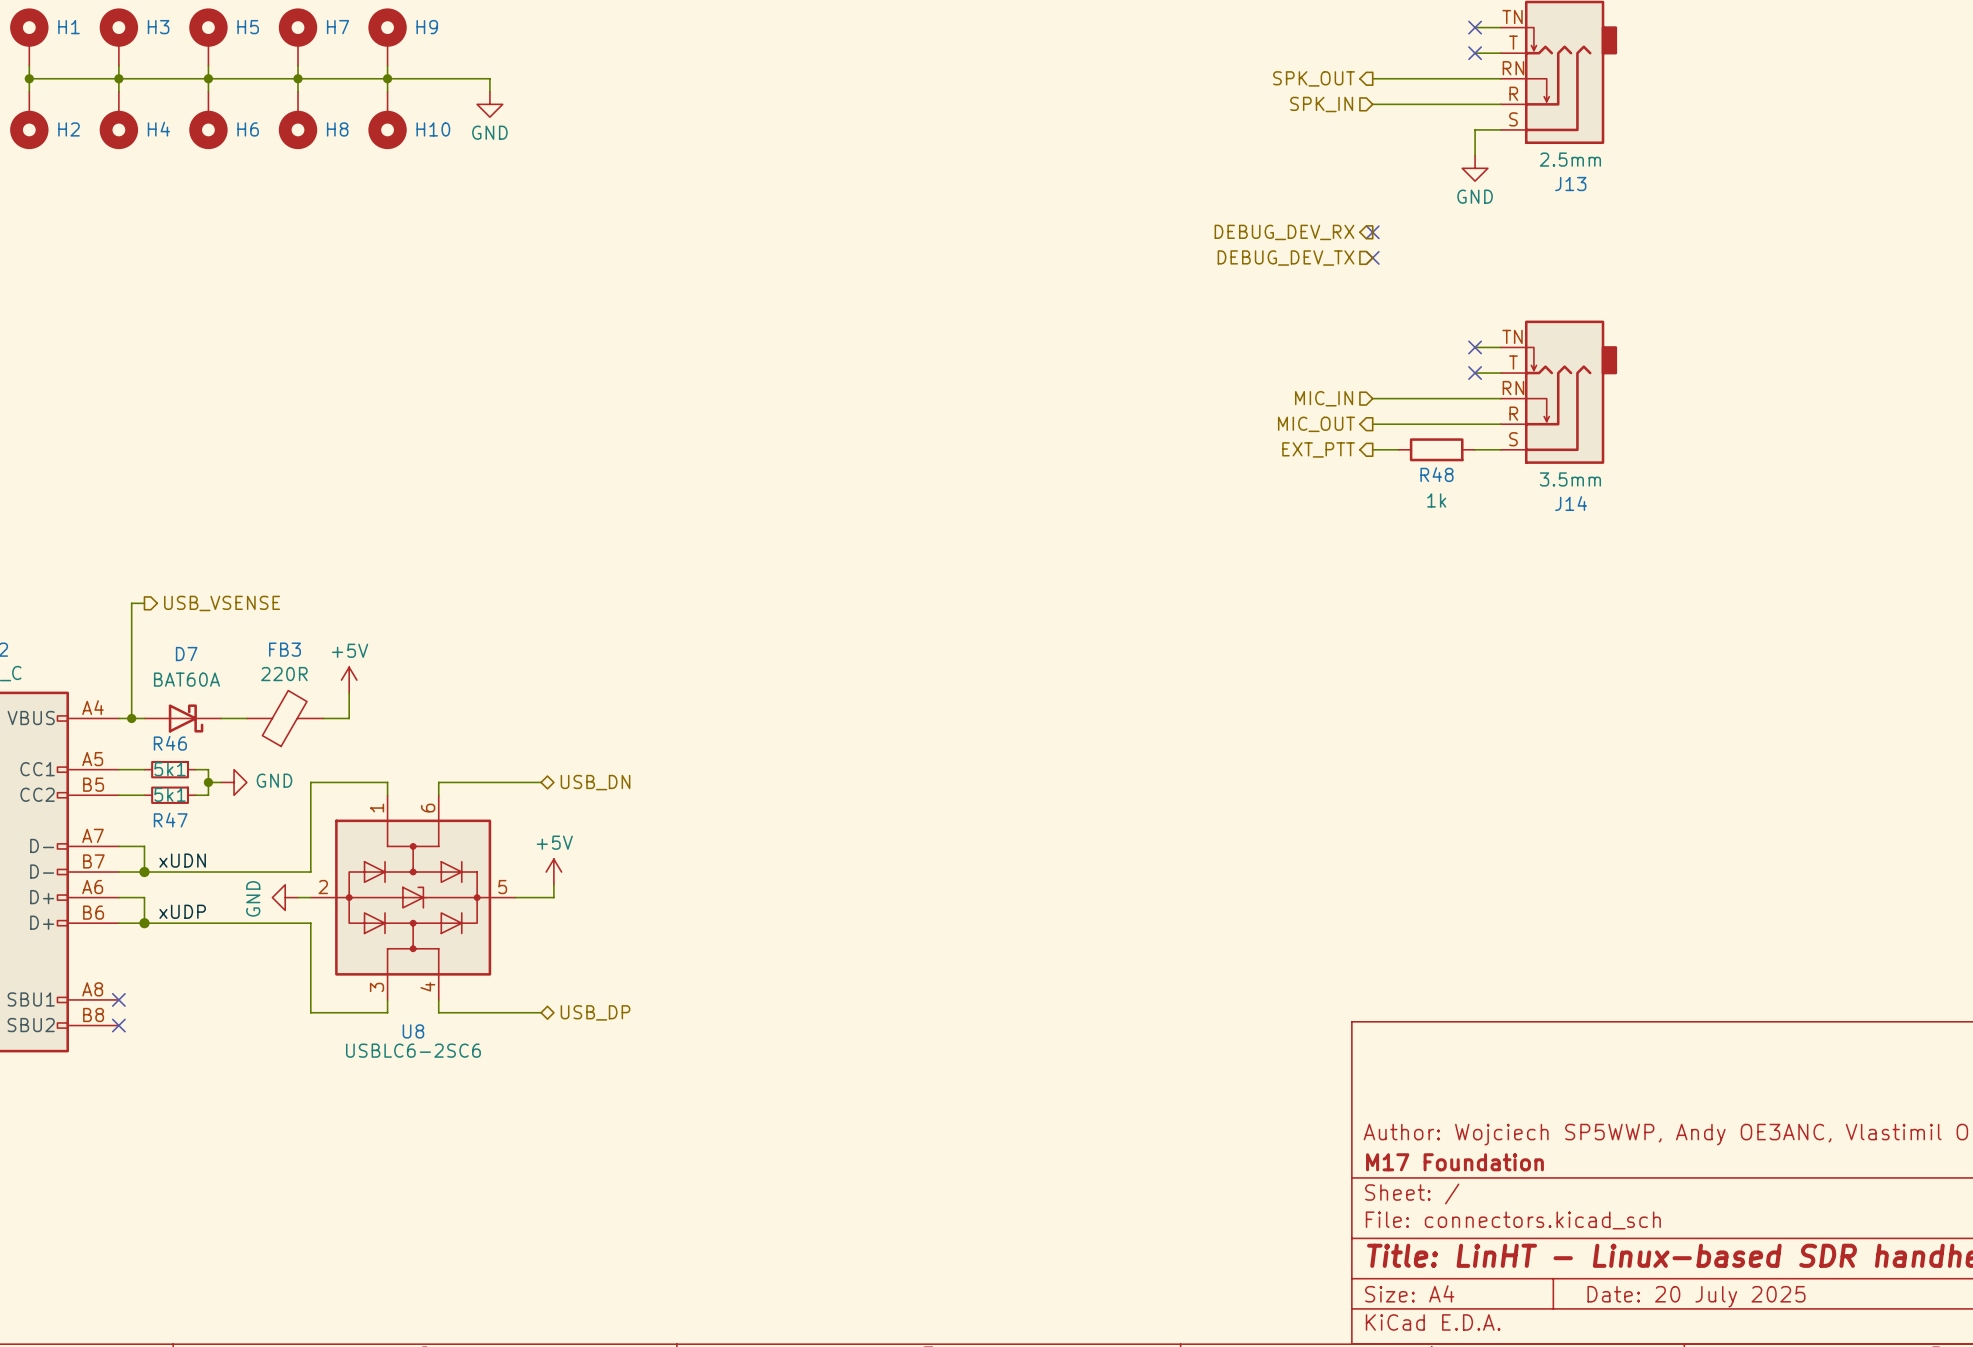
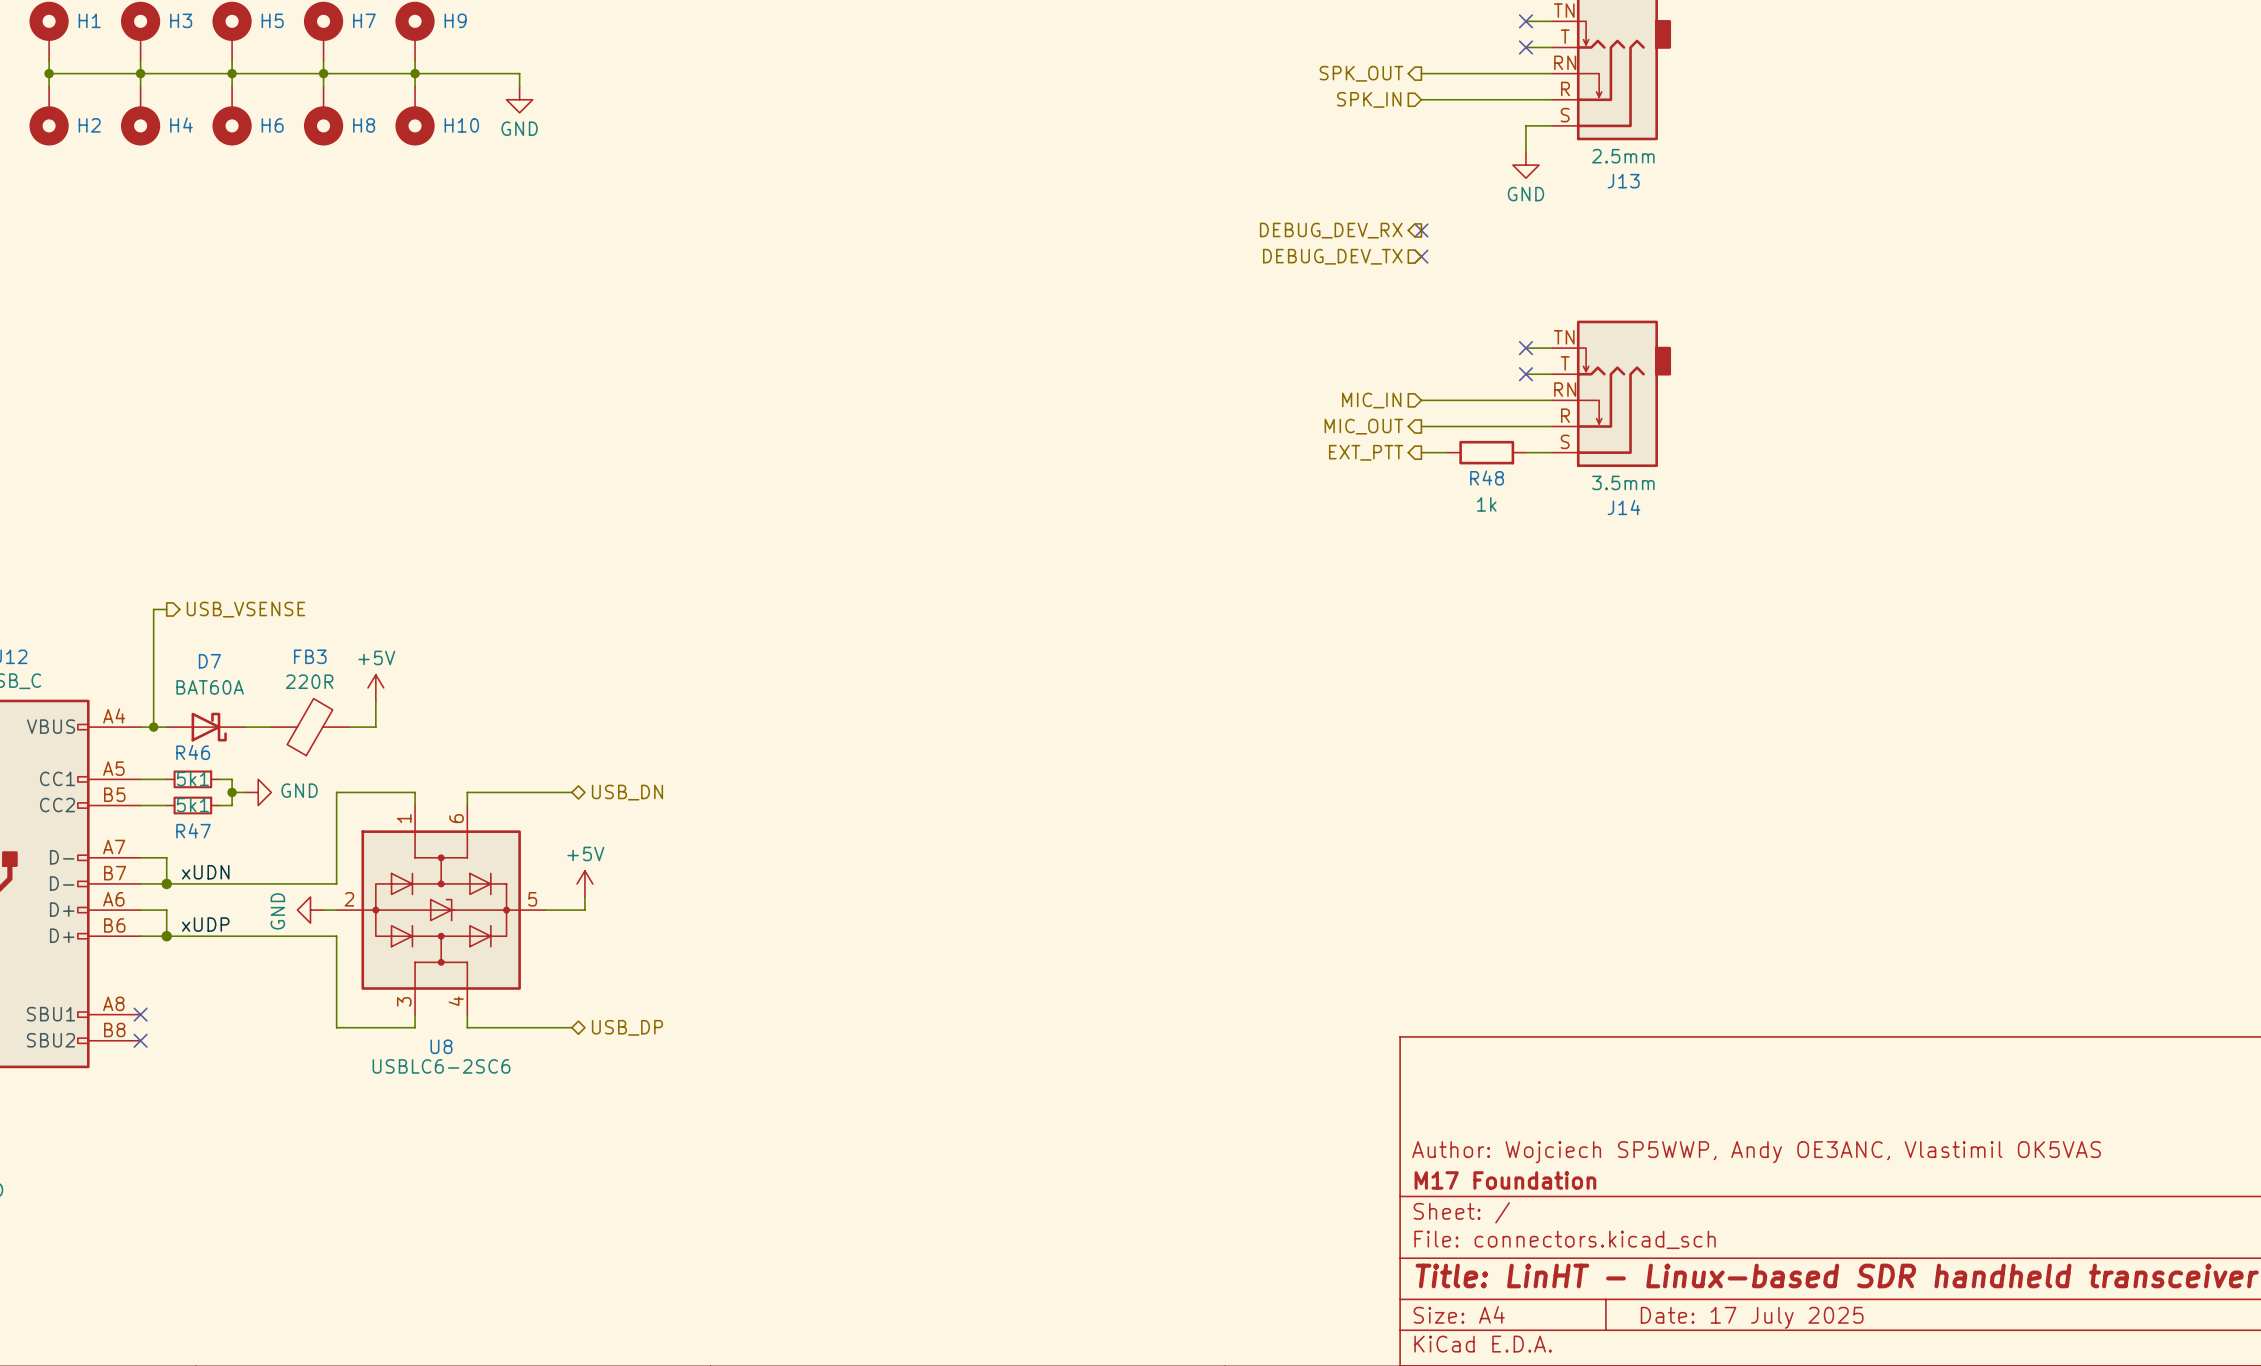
title block: Date: 20 July 2025 (1696, 1296) -> Date: 17 July 2025 (1752, 1317)

